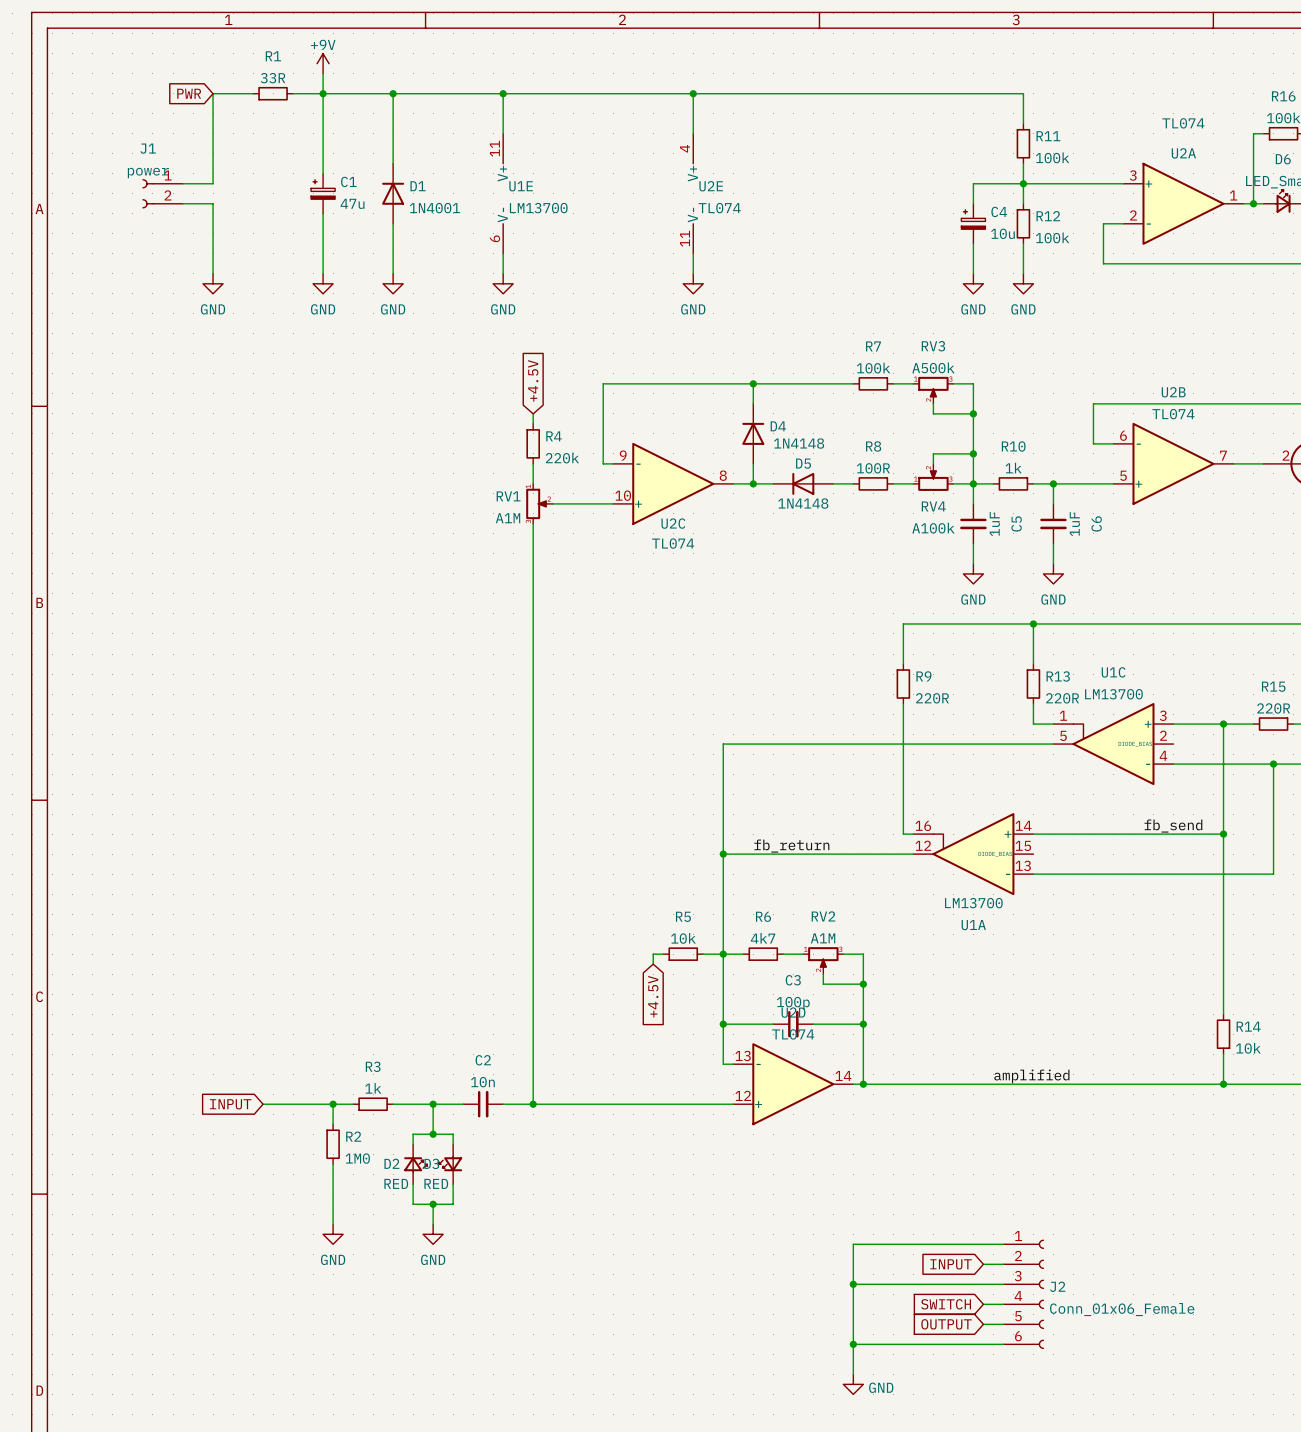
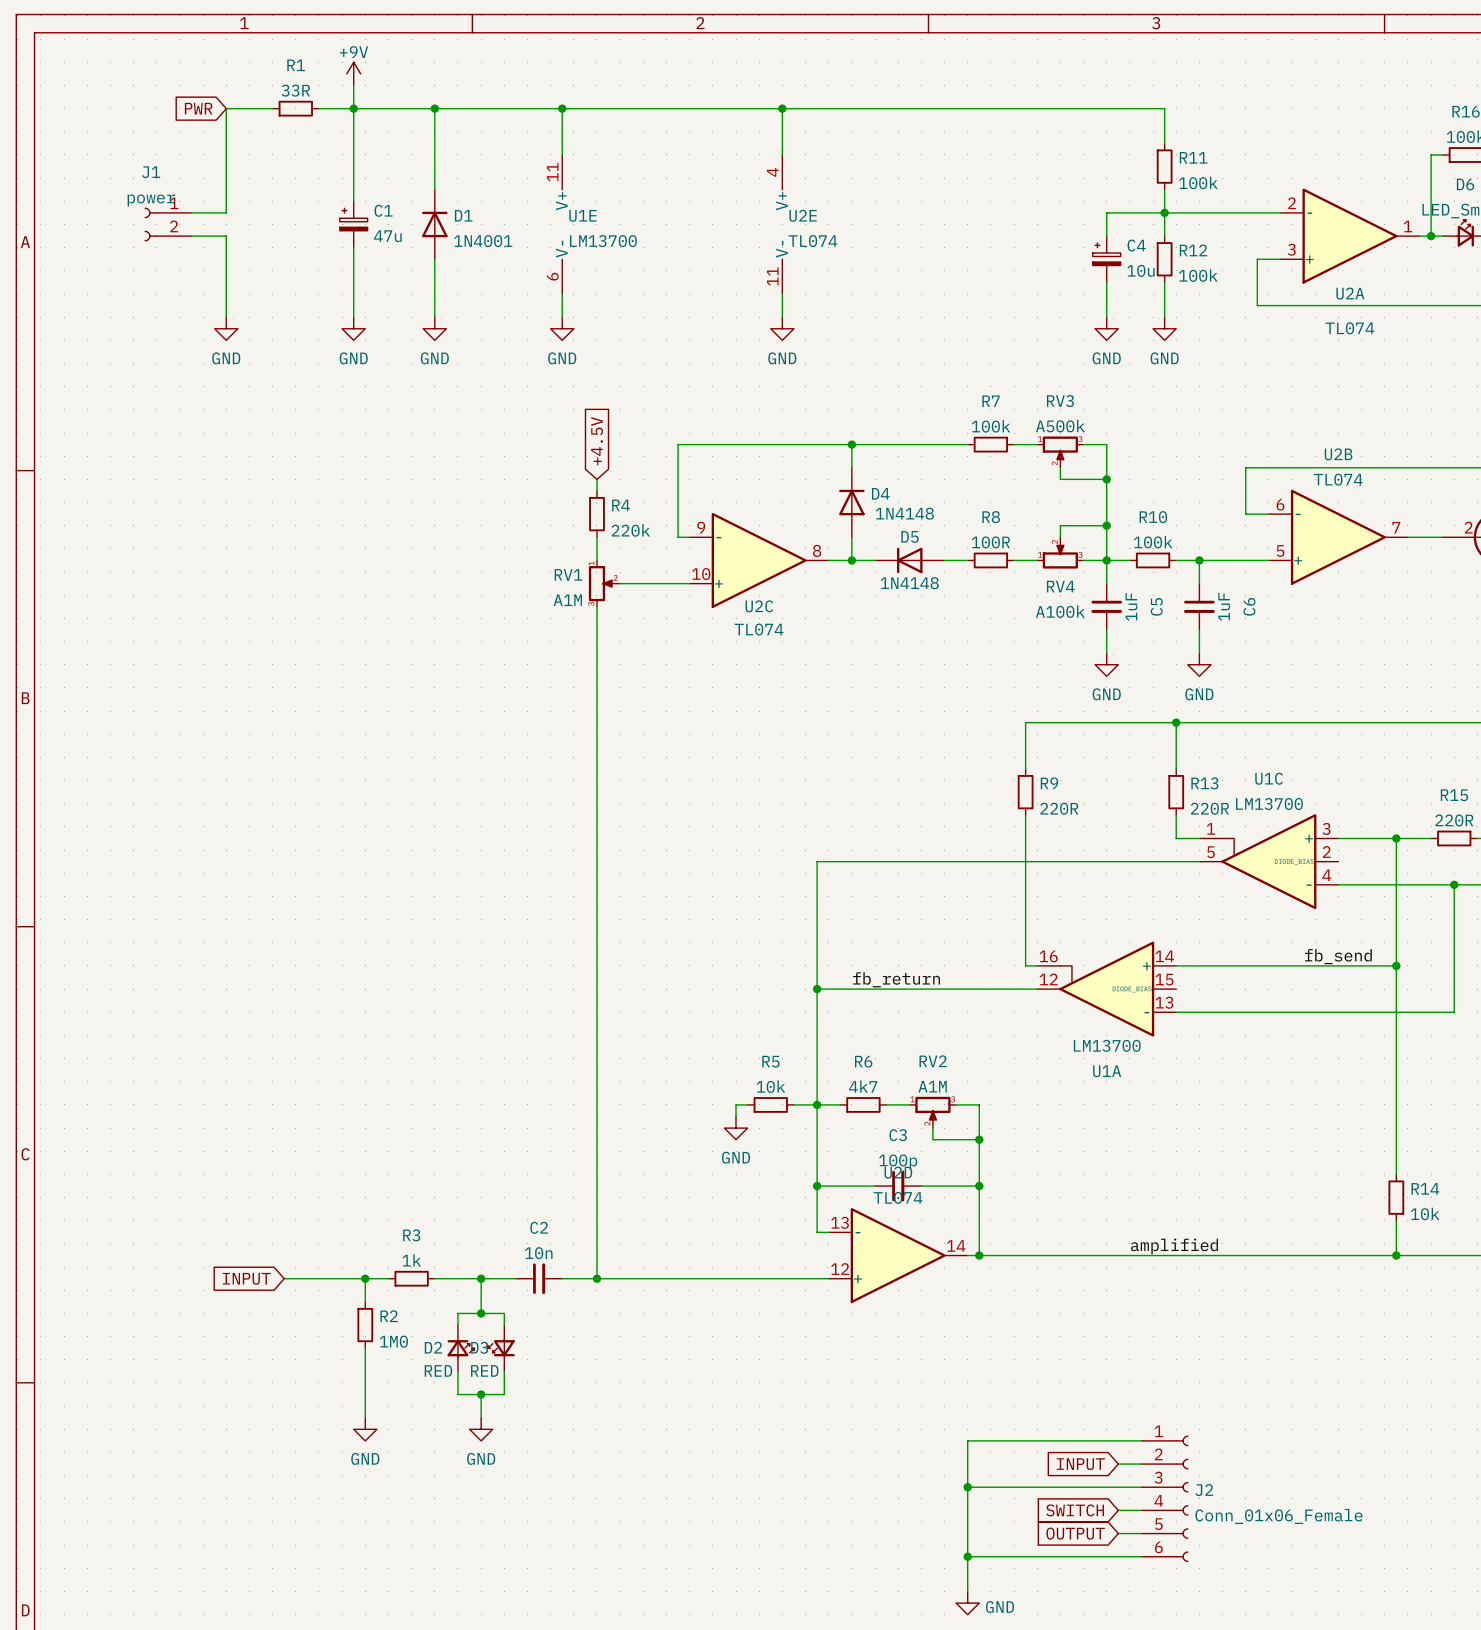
U2A flip: as is (1183, 203) -> up-down (1350, 236)
R10 value: 1k (1013, 468) -> 100k (1153, 542)
power symbol: none -> GND (736, 1128)
global label: +4.5V (653, 996) -> none

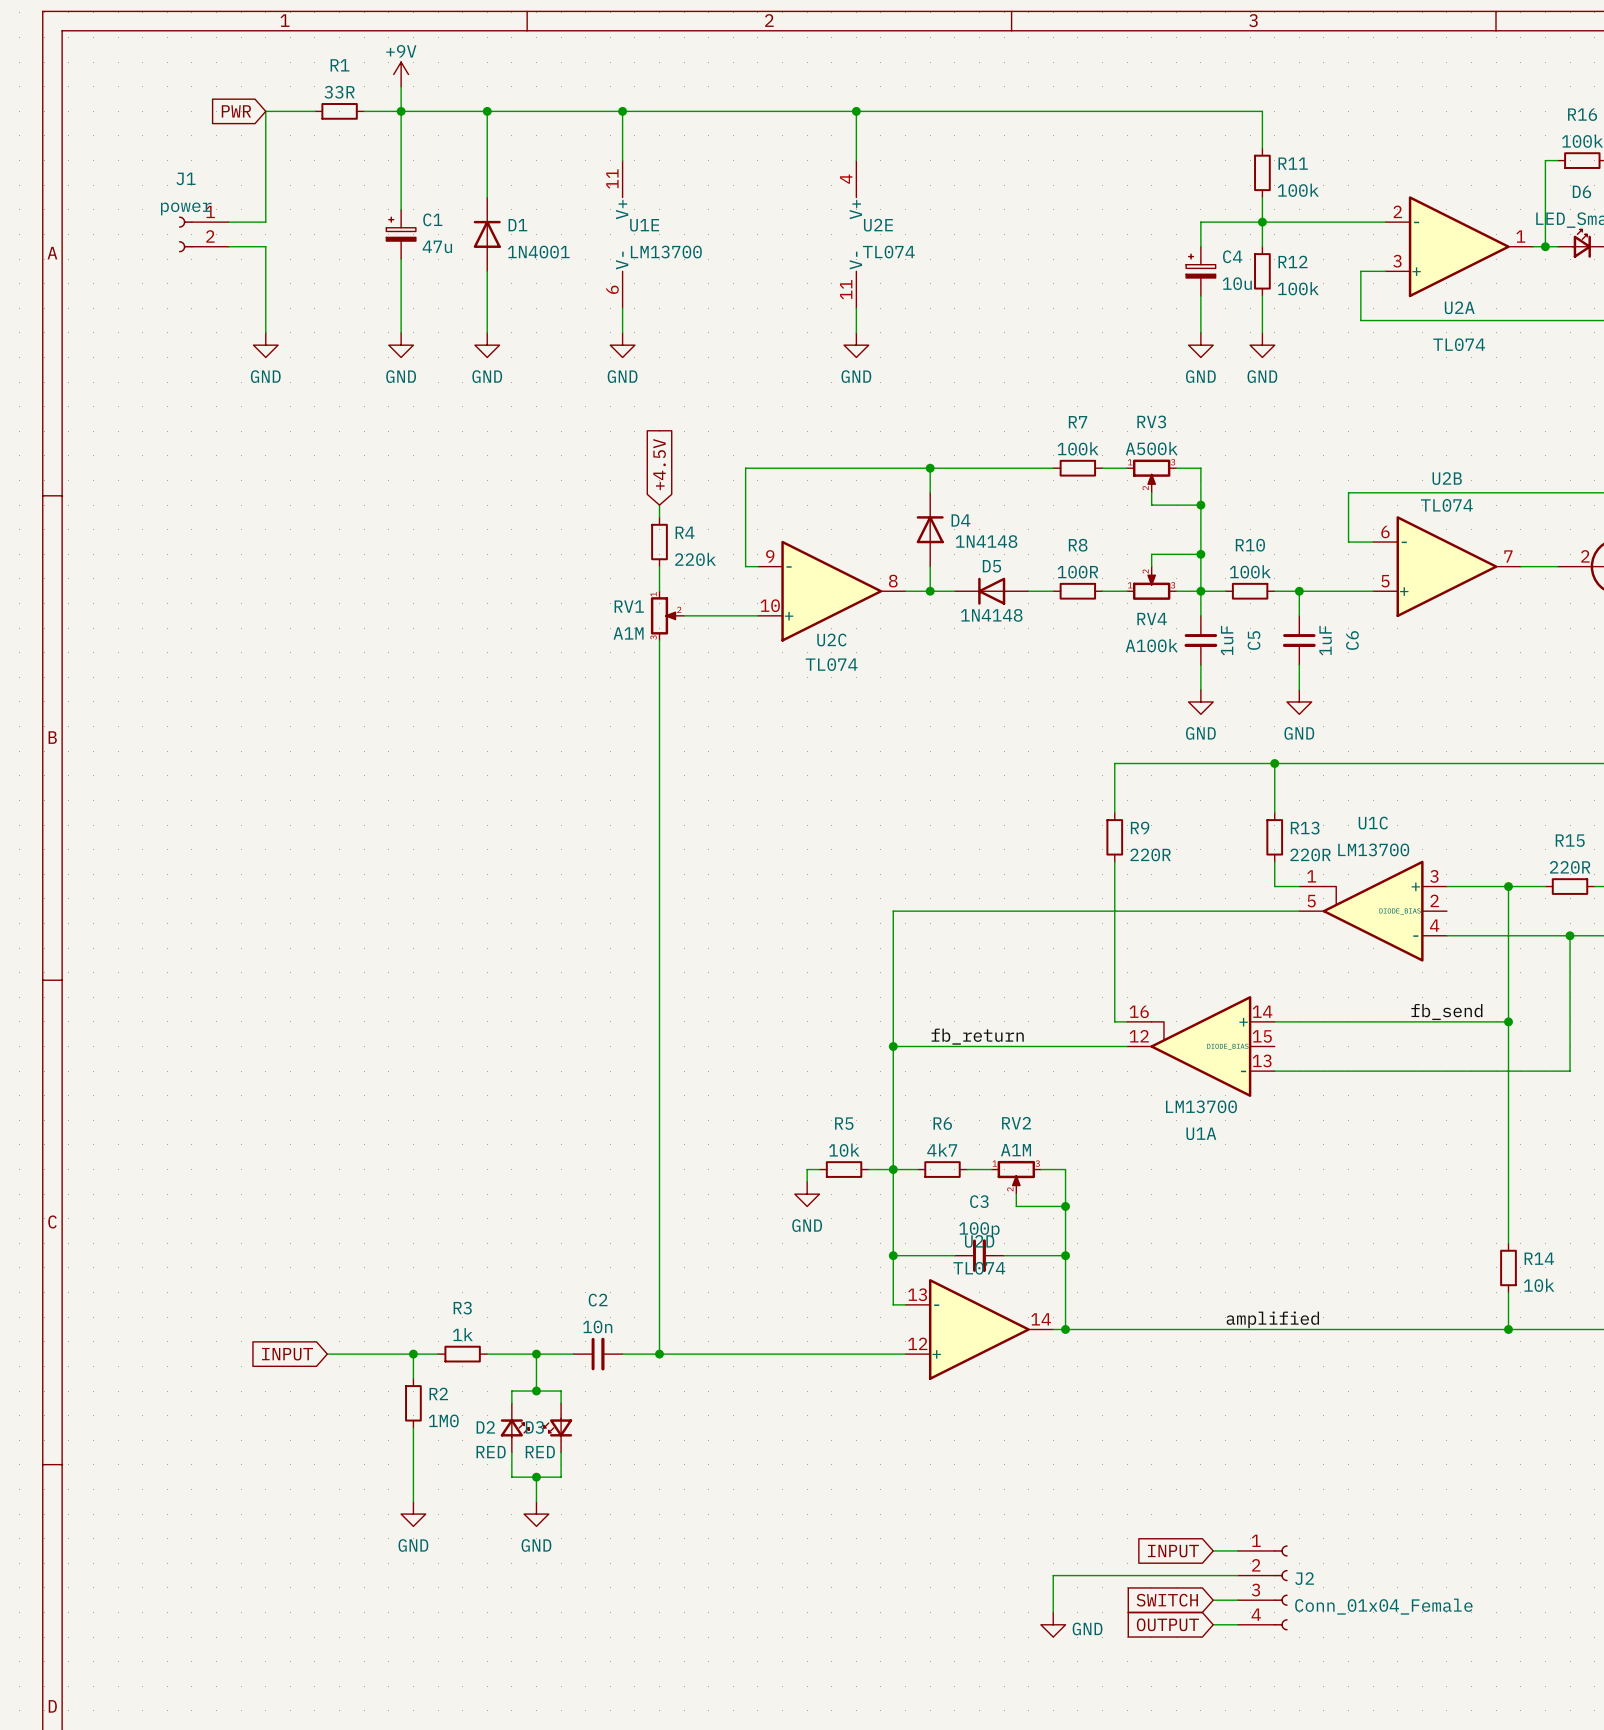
J2 symbol: [1141, 1435, 1189, 1563] -> [1237, 1545, 1288, 1631]
wire: (1141, 1440) (967, 1440) (967, 1487) -> none
junction: (967, 1487) -> none
J2 value: Conn_01x06_Female (1278, 1516) -> Conn_01x04_Female (1383, 1606)
wire: (967, 1521) (967, 1591) -> none
wire: (967, 1556) (1141, 1556) -> none
junction: (967, 1556) -> none
power symbol position: GND (967, 1603) -> GND (1053, 1624)

